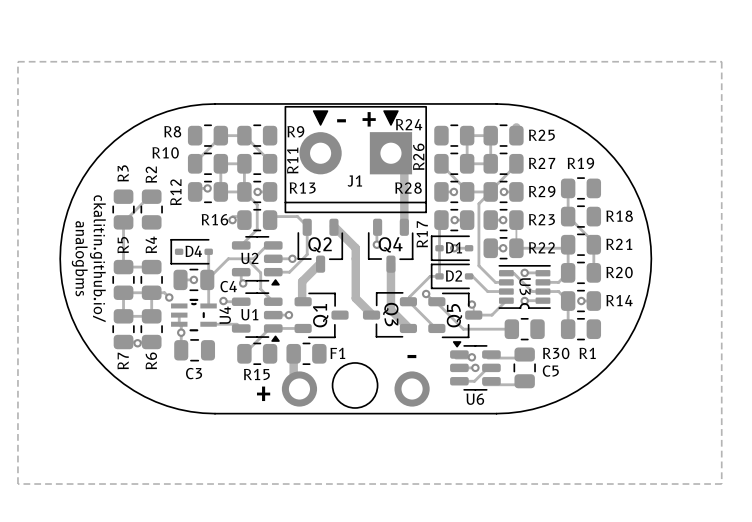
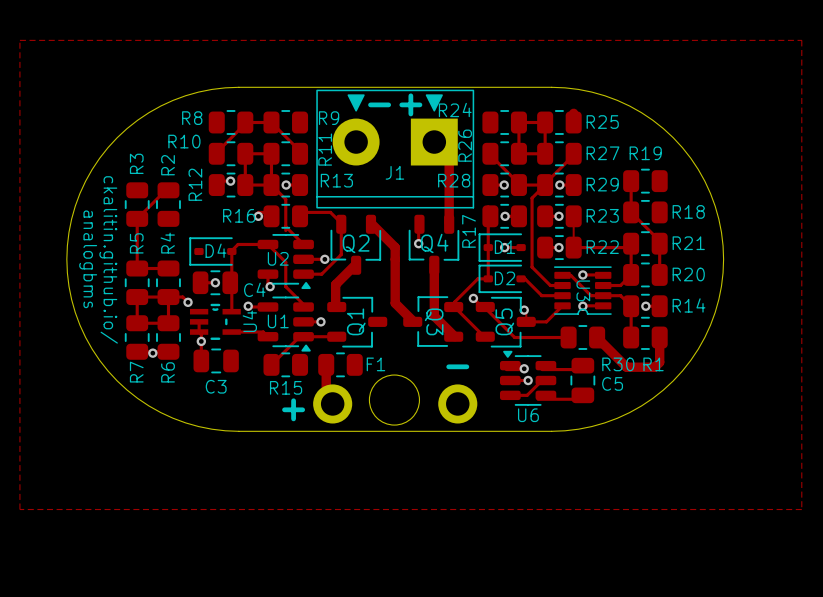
track: (257, 229) (241, 245) -> none
track: (273, 245) (267, 245) (253, 258) (228, 258) (207, 279) -> (303, 244) (285, 226) (285, 230)
track: (246, 258) (260, 272) (260, 289) (273, 301) -> (231, 251) (238, 244) (267, 244) (285, 262) (285, 286) (303, 304) (303, 307)
track: none -> (659, 337) (659, 362) (654, 367) (626, 367) (597, 337)

